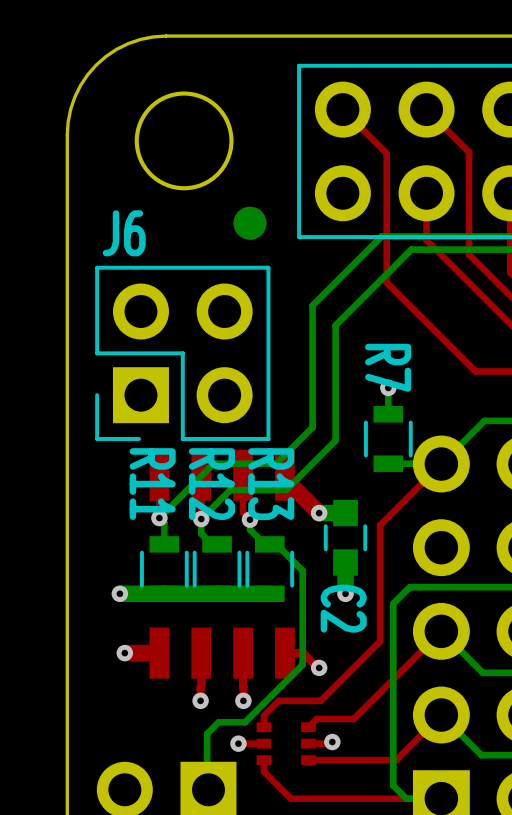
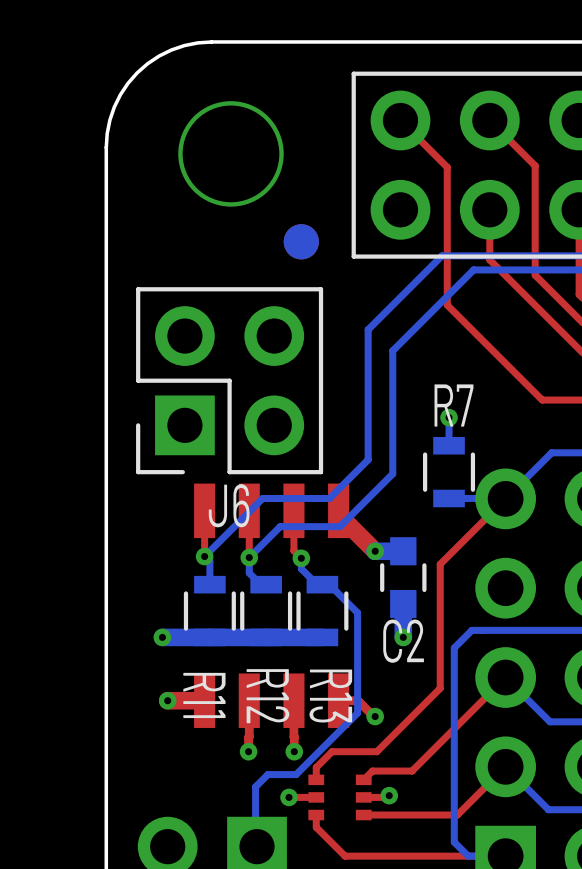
J6 name position: J6 (124, 233) -> J6 (229, 505)
R7 name rotation: 0° (388, 367) -> 90° counterclockwise (453, 405)
R11 name position: R11 (152, 484) -> R11 (204, 695)
R12 name position: R12 (211, 484) -> R12 (267, 696)
R13 name position: R13 (271, 484) -> R13 (330, 696)
C2 name rotation: 0° (343, 608) -> 90° counterclockwise (403, 641)

